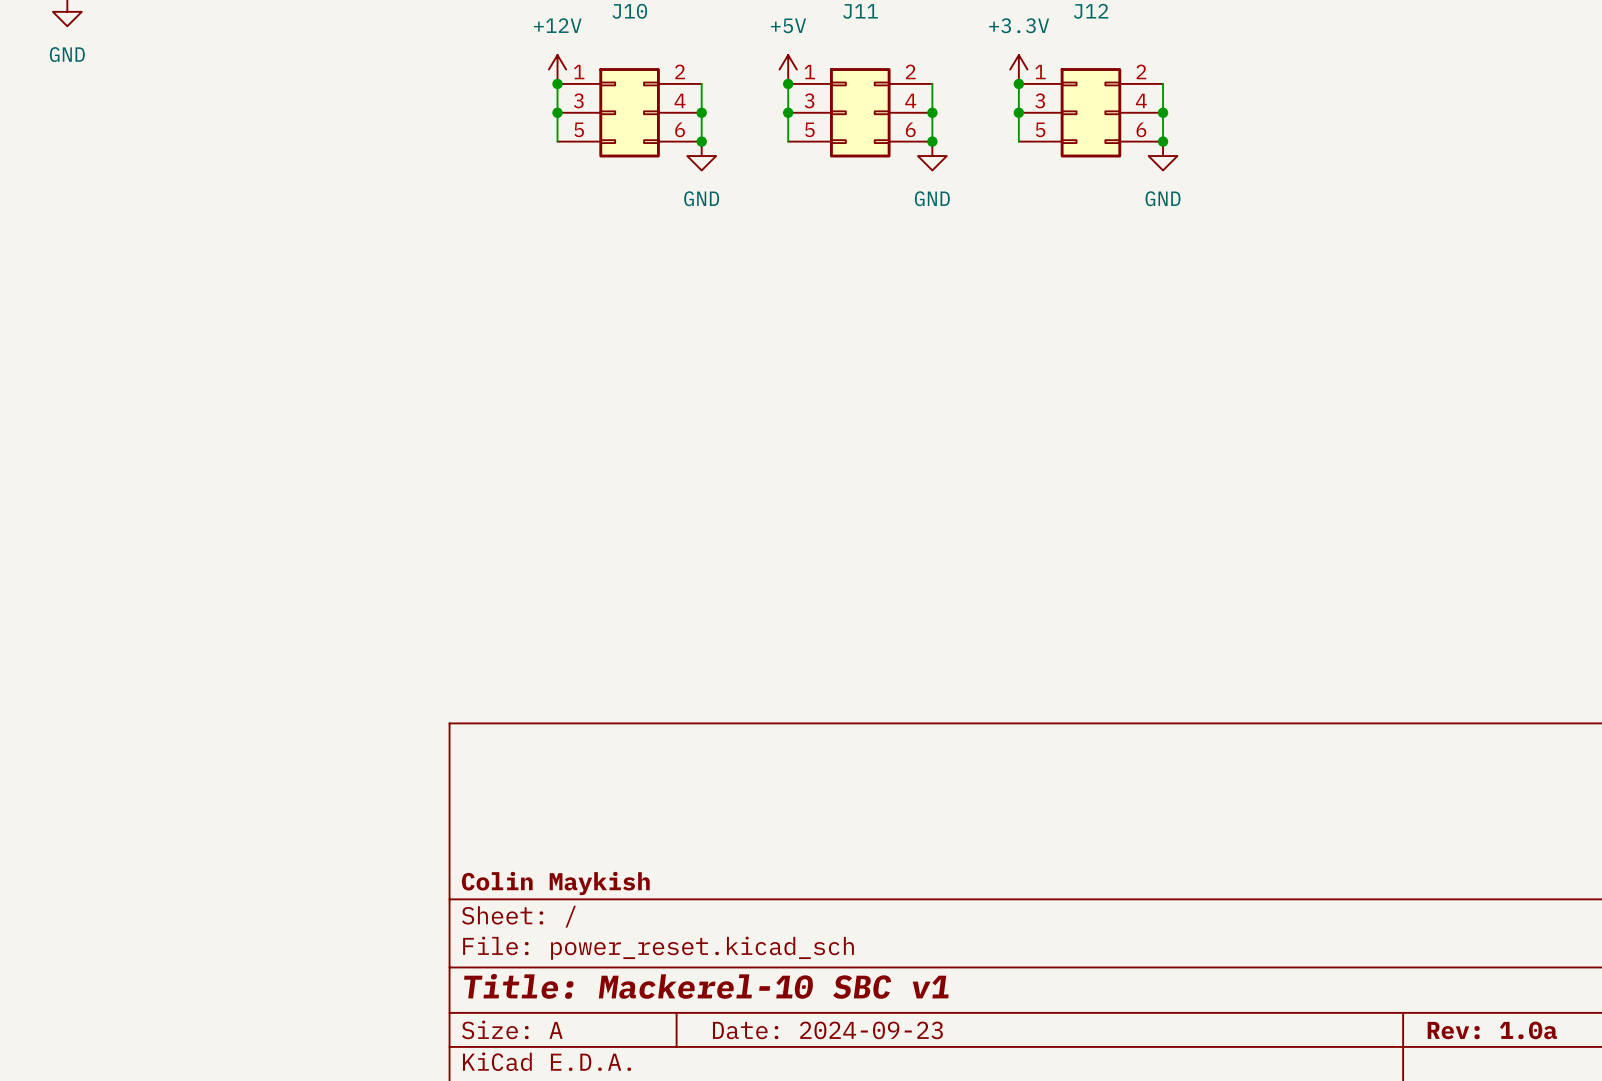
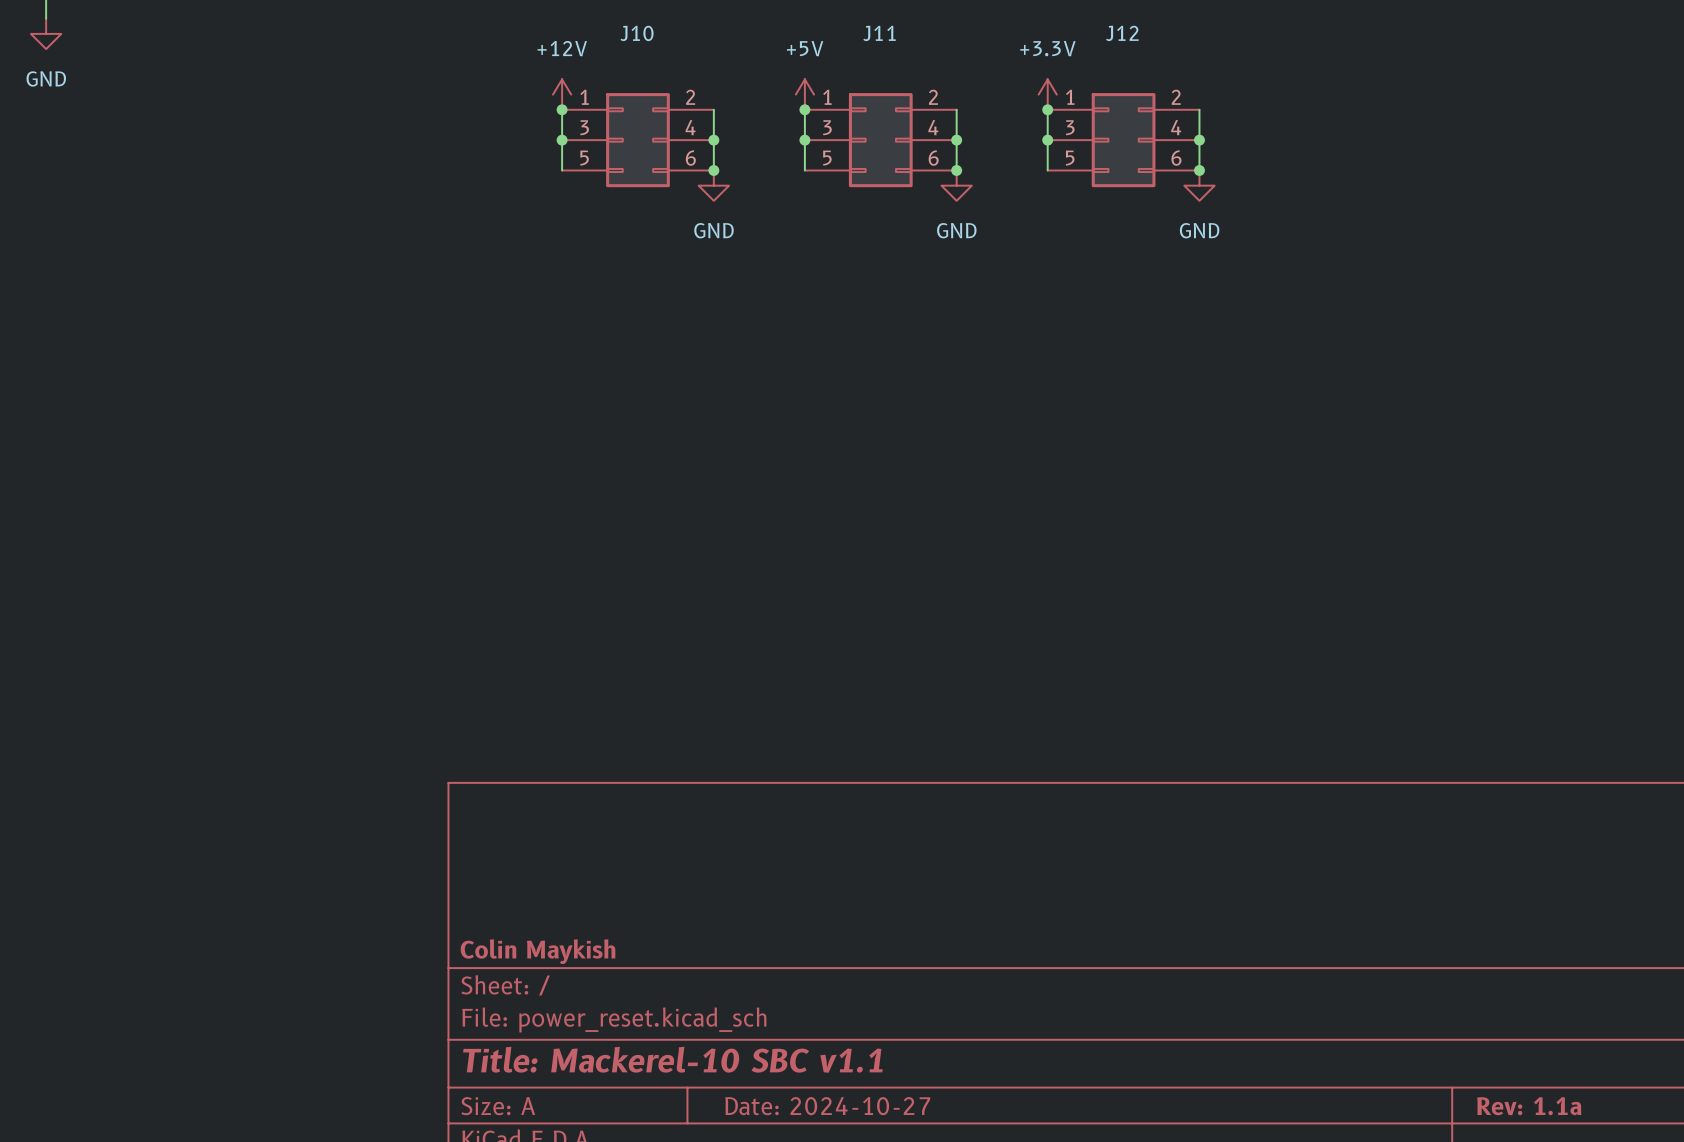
title block: Title: Mackerel-10 SBC v1 (706, 986) -> Title: Mackerel-10 SBC v1.1 (672, 1059)
title block: Date: 2024-09-23 (827, 1030) -> Date: 2024-10-27 (827, 1106)
title block: Rev: 1.0a (1492, 1030) -> Rev: 1.1a (1529, 1106)

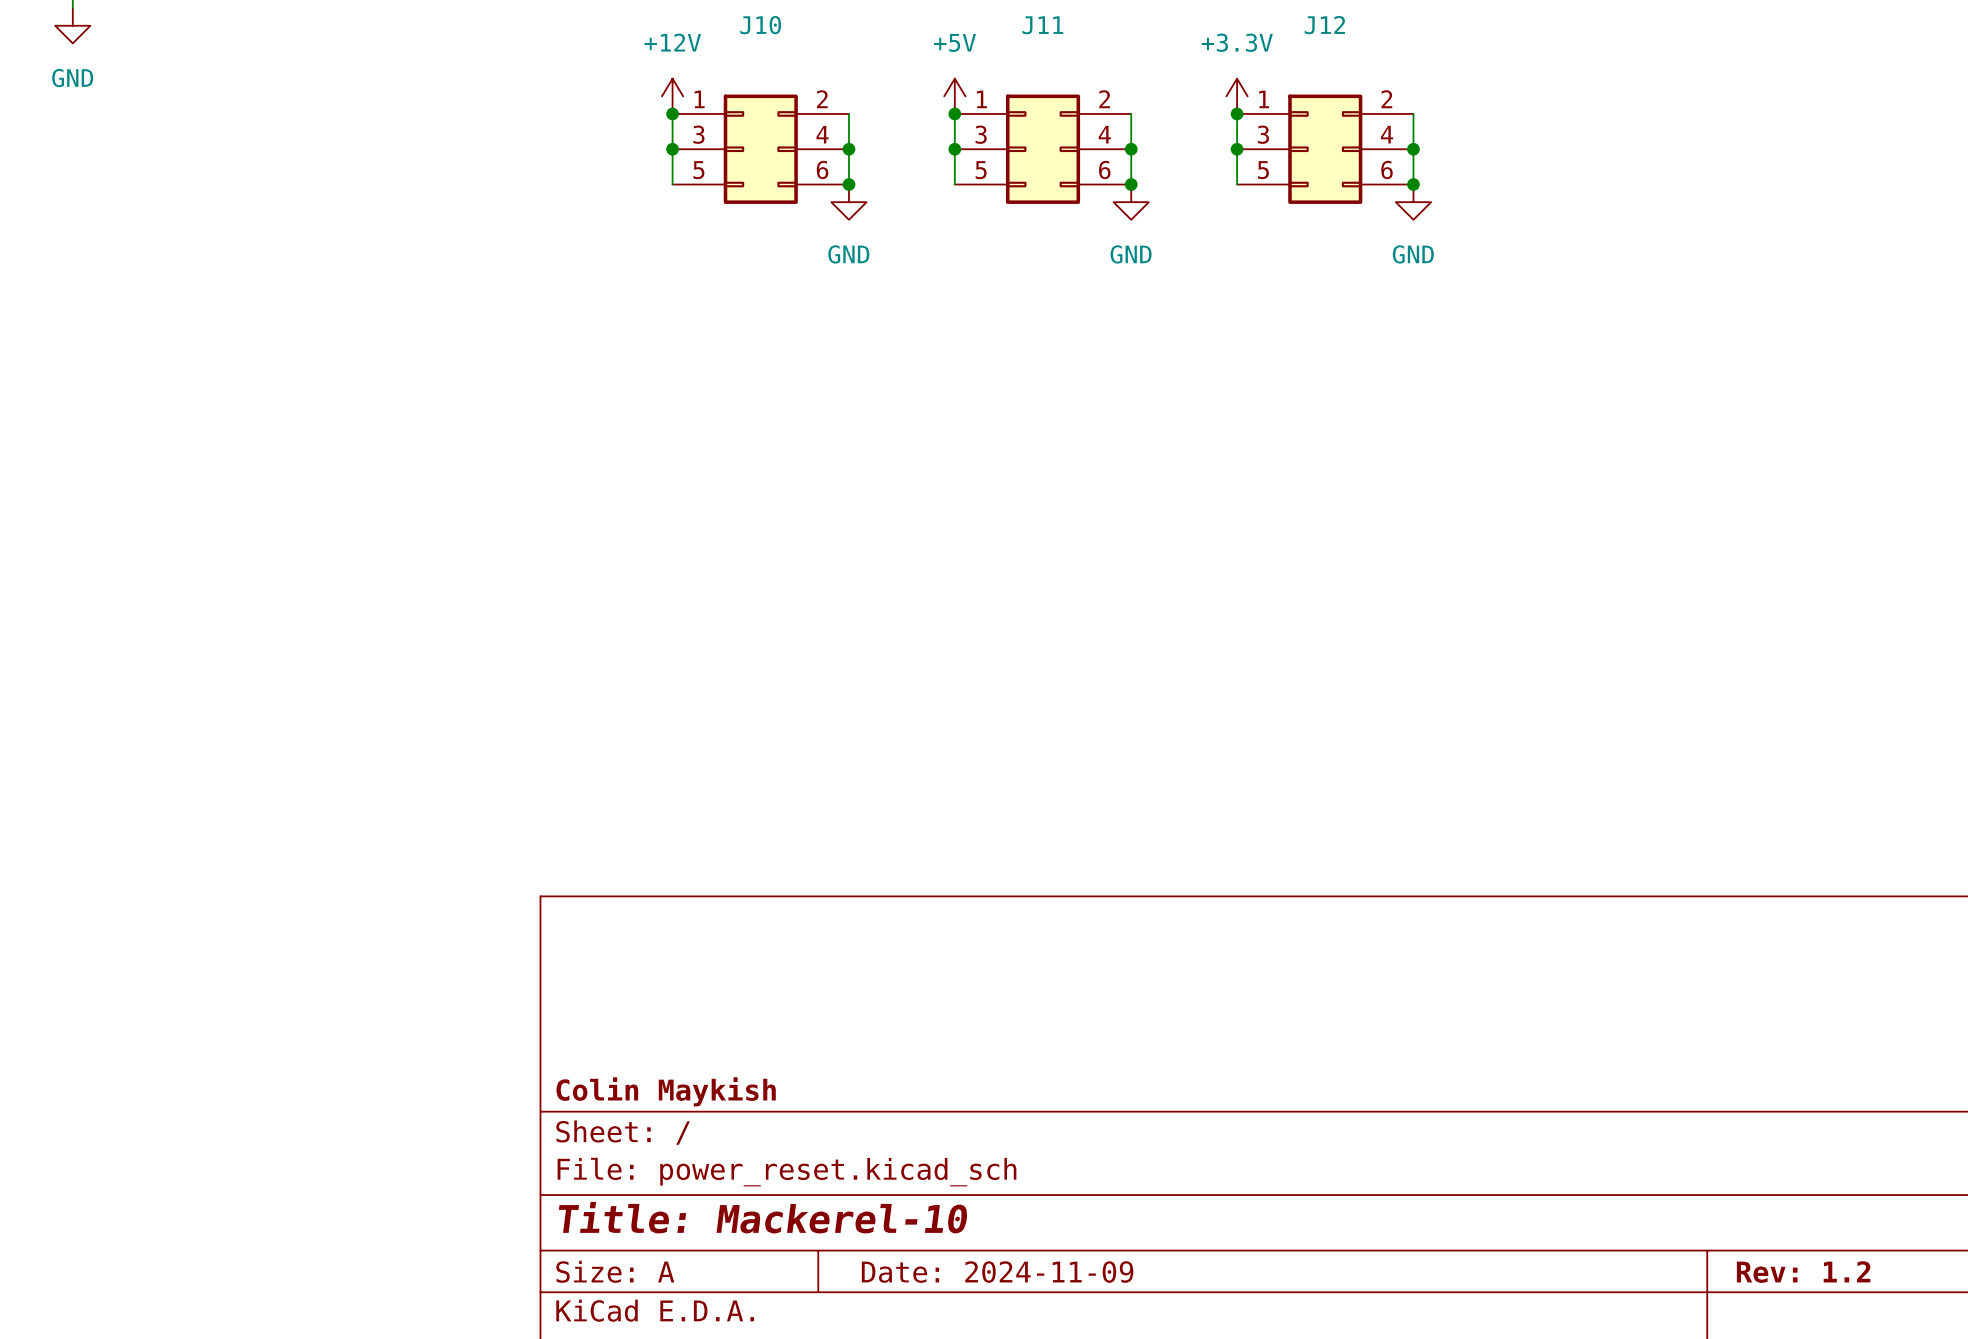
title block: Title: Mackerel-10 SBC v1.1 (672, 1059) -> Title: Mackerel-10 (763, 1217)
title block: Date: 2024-10-27 (827, 1106) -> Date: 2024-11-09 (997, 1272)
title block: Rev: 1.1a (1529, 1106) -> Rev: 1.2 (1803, 1272)

